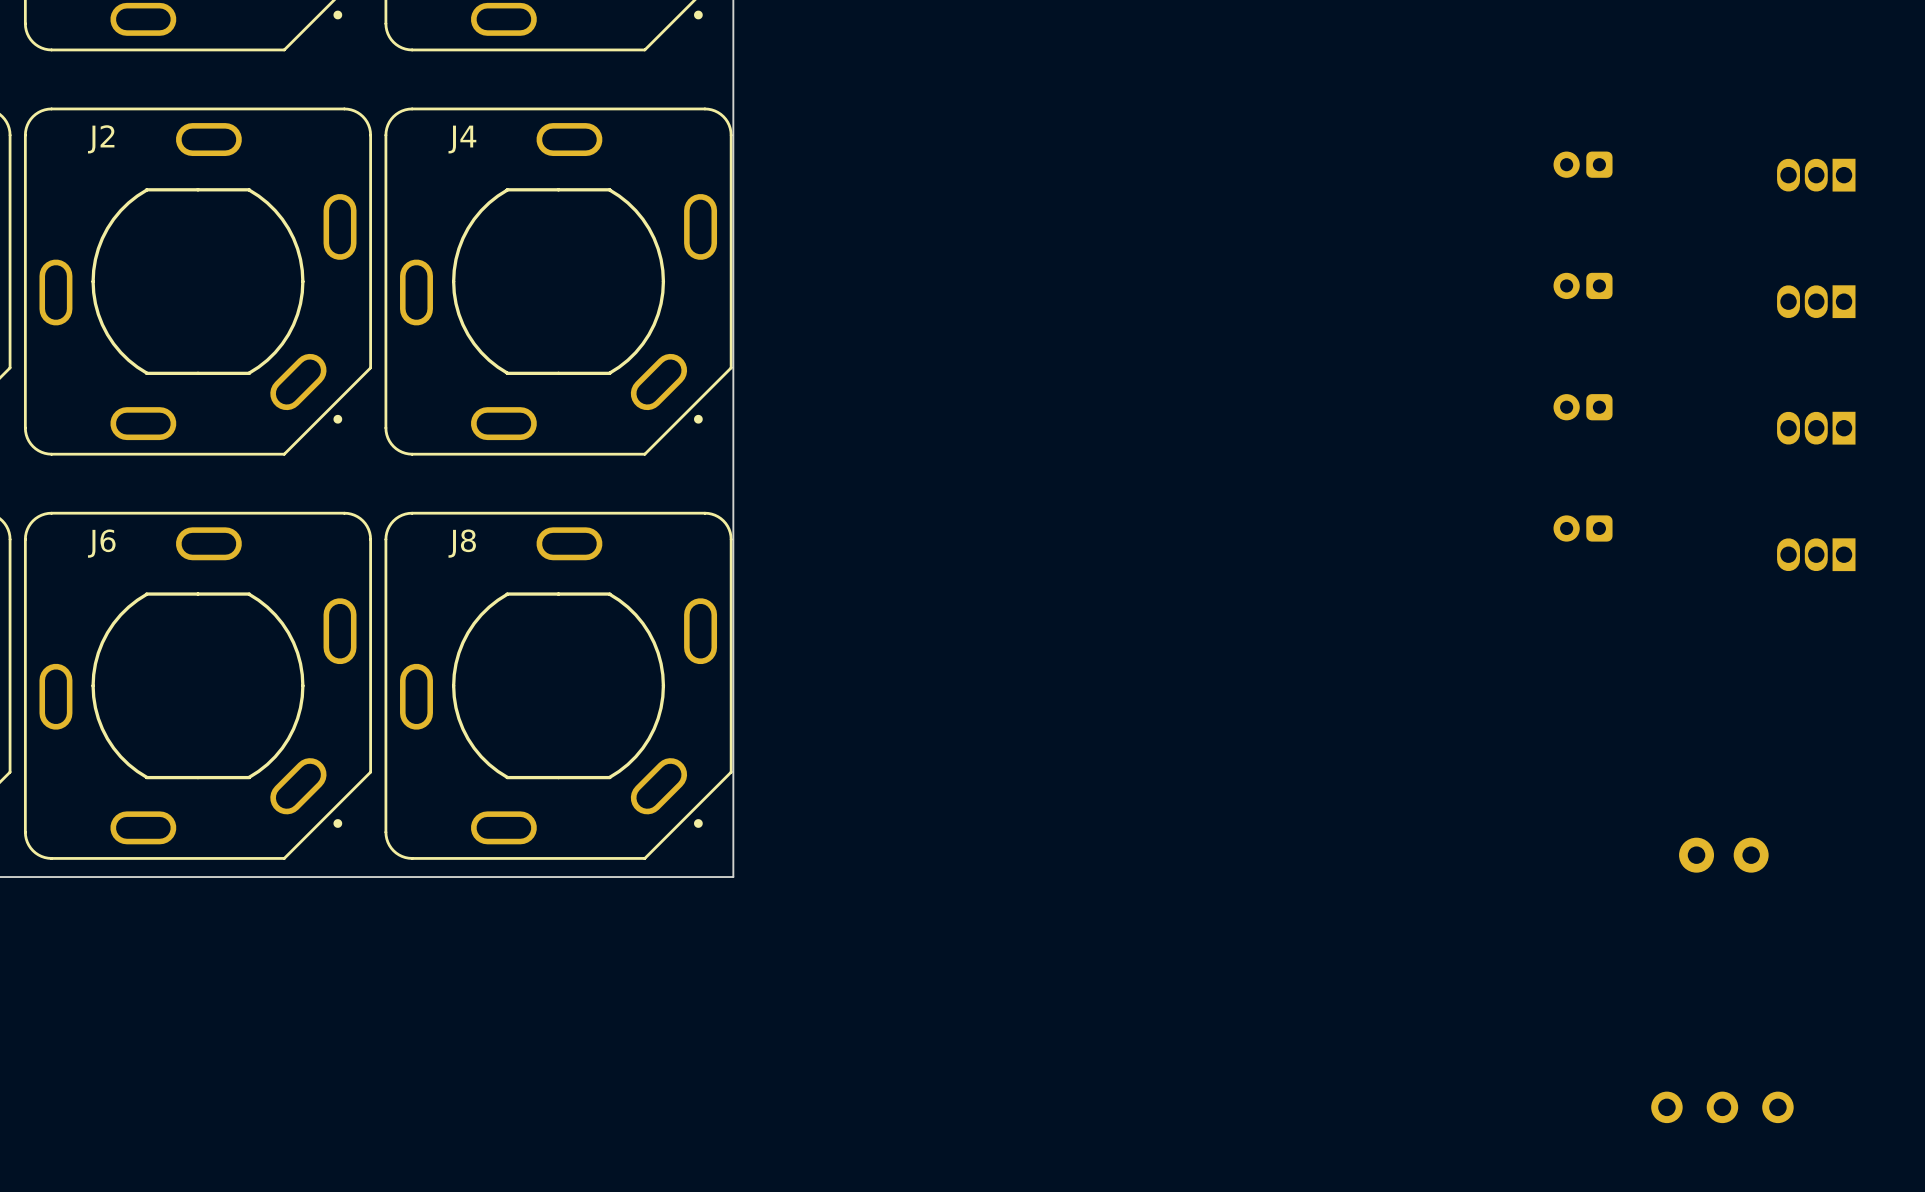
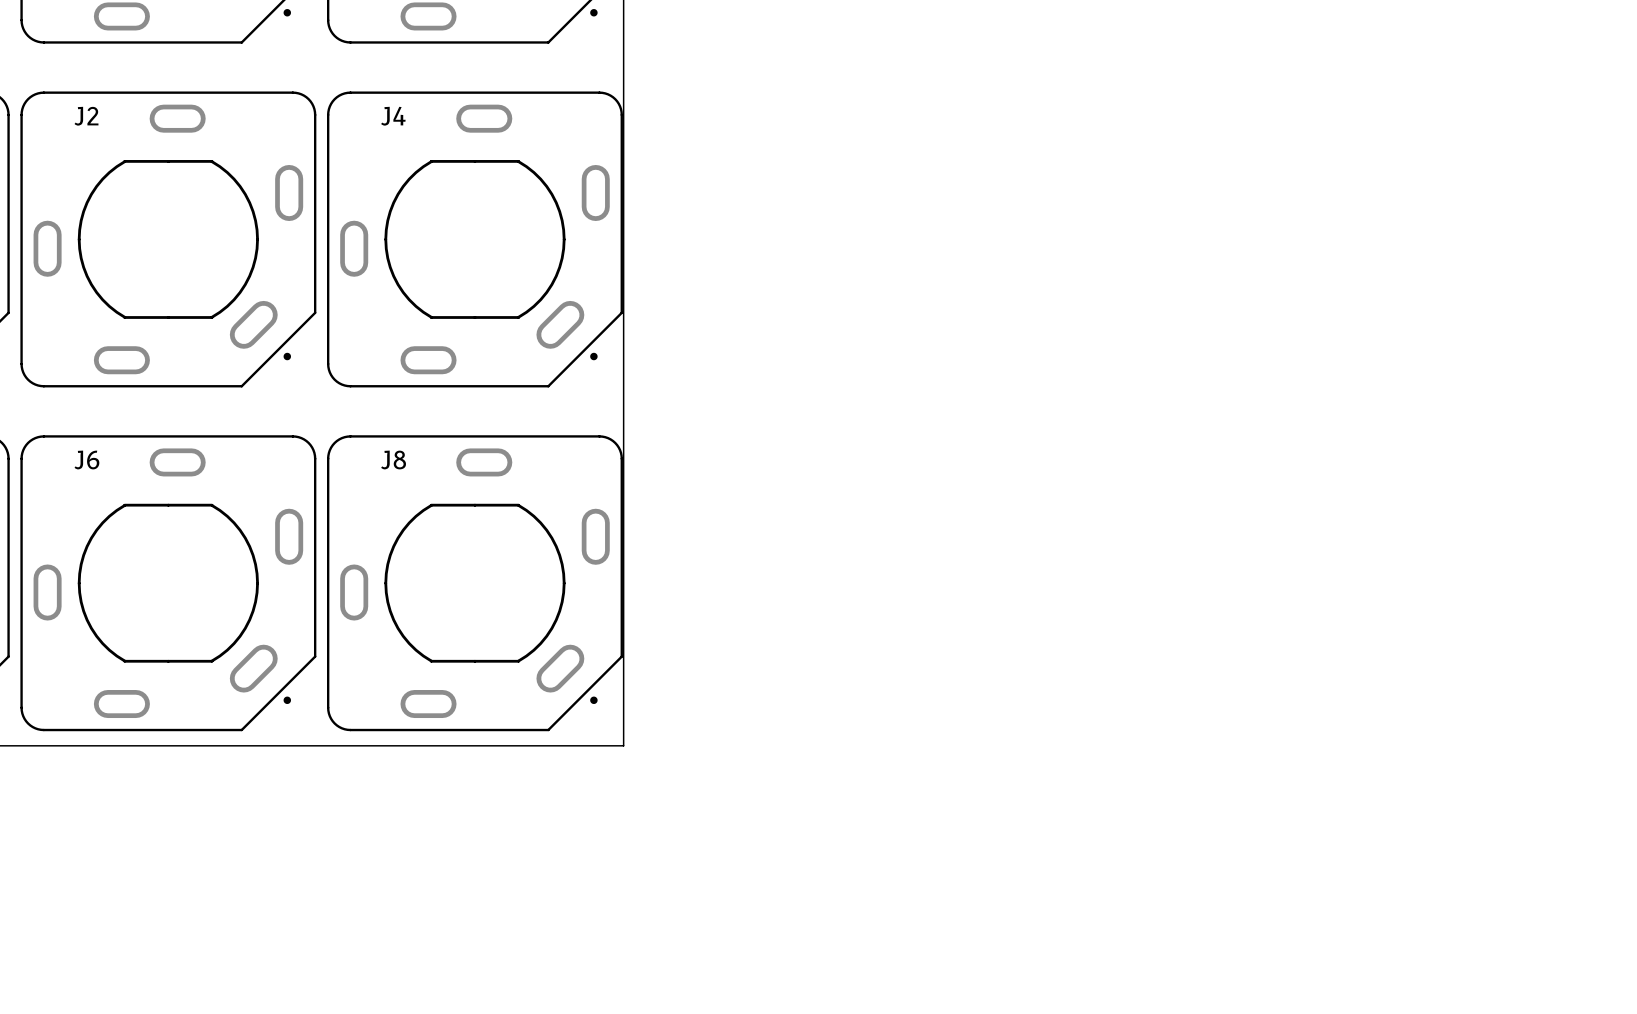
part: (1583, 164) -> none
part: (1816, 175) -> none
part: (1583, 285) -> none
part: (1816, 301) -> none
part: (1583, 407) -> none
part: (1816, 428) -> none
part: (1583, 528) -> none
part: (1816, 554) -> none
part: (1723, 855) -> none
part: (1722, 1107) -> none

